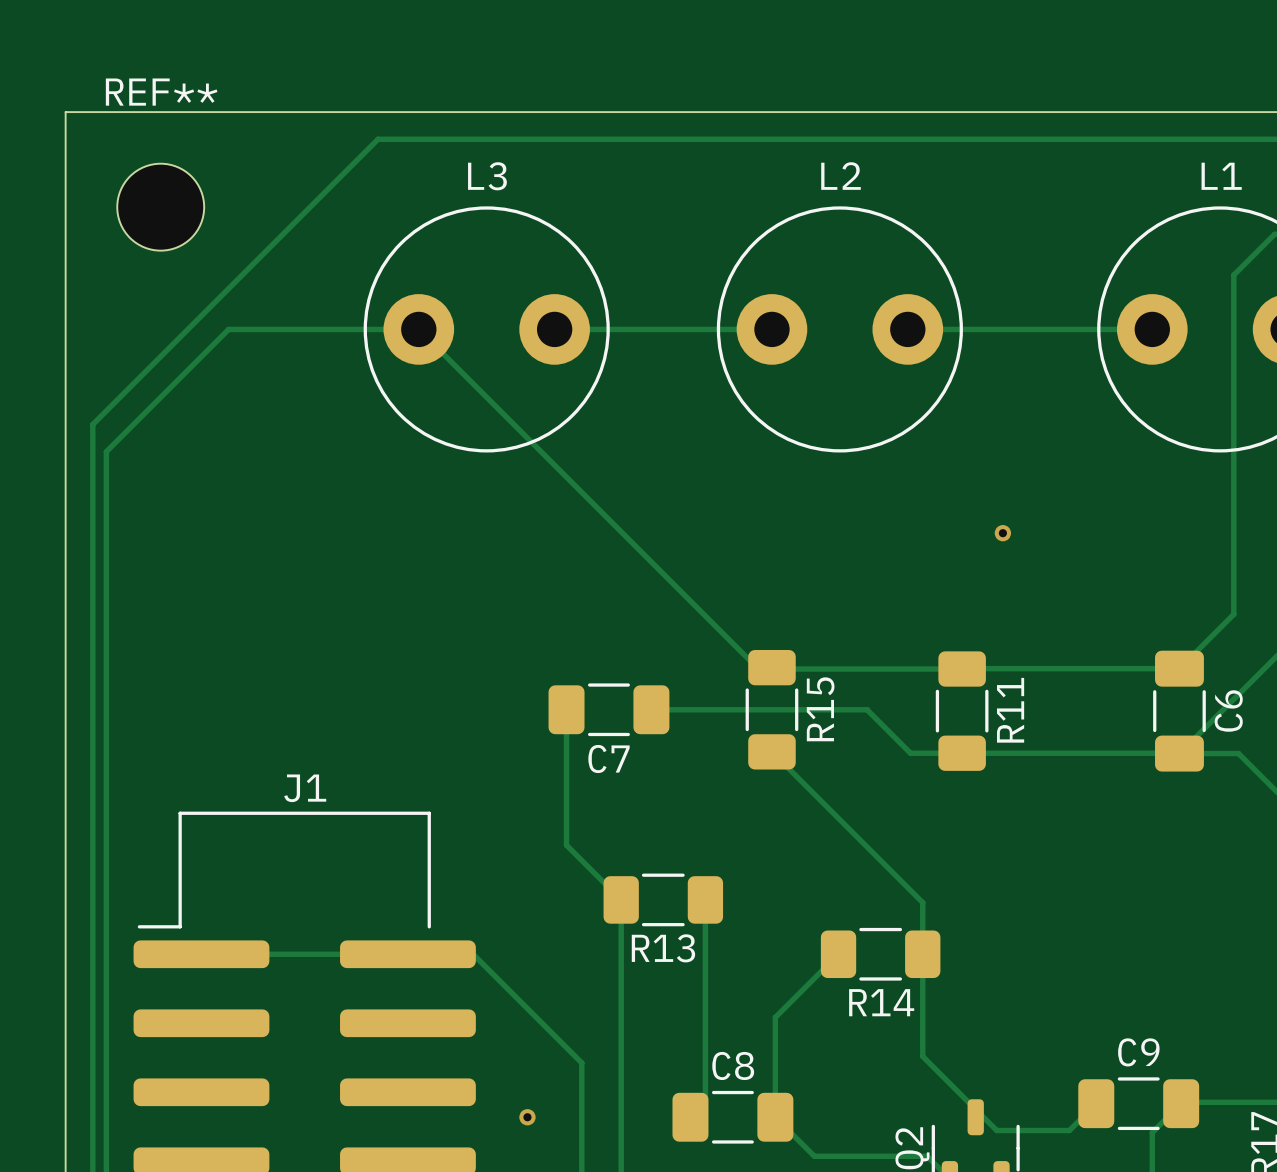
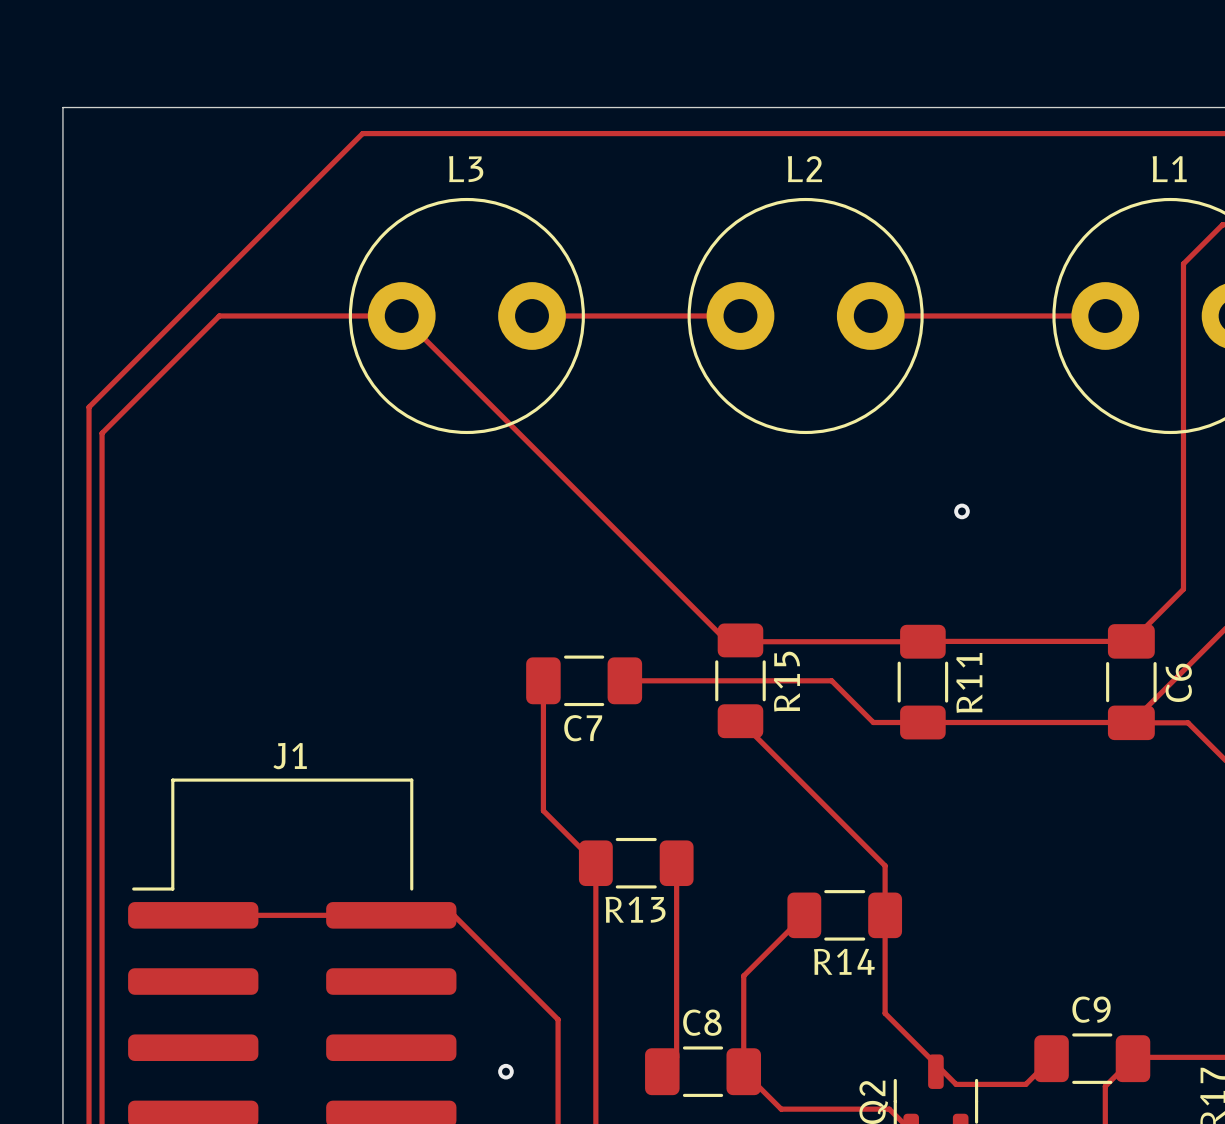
REF**: (160, 207) -> none

